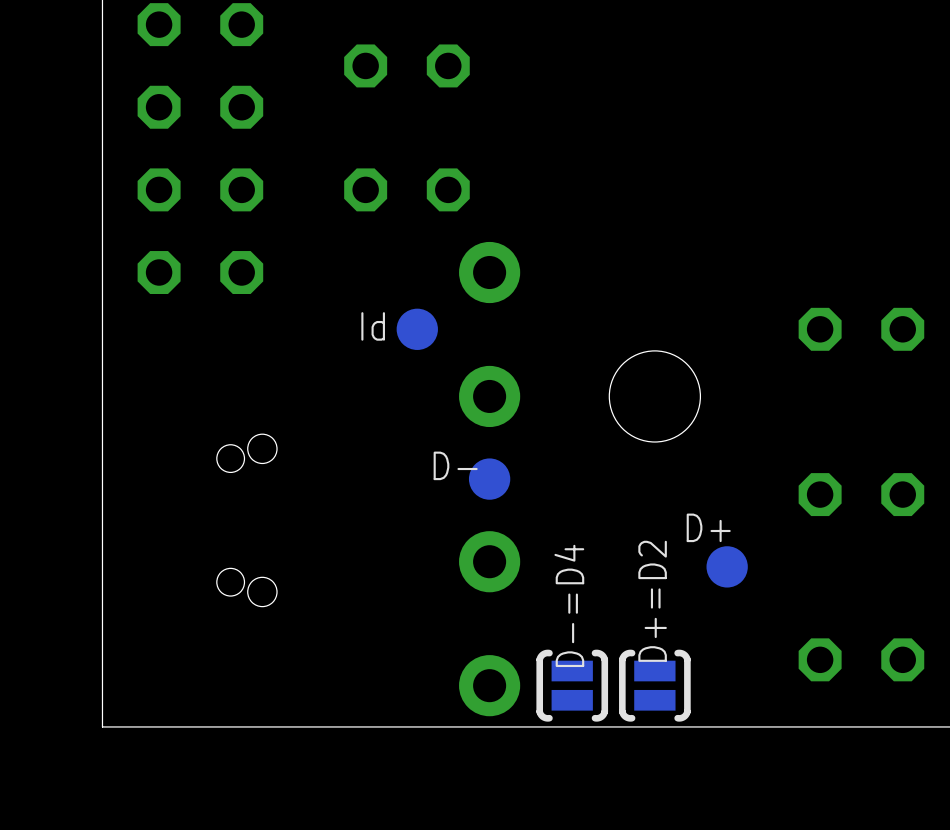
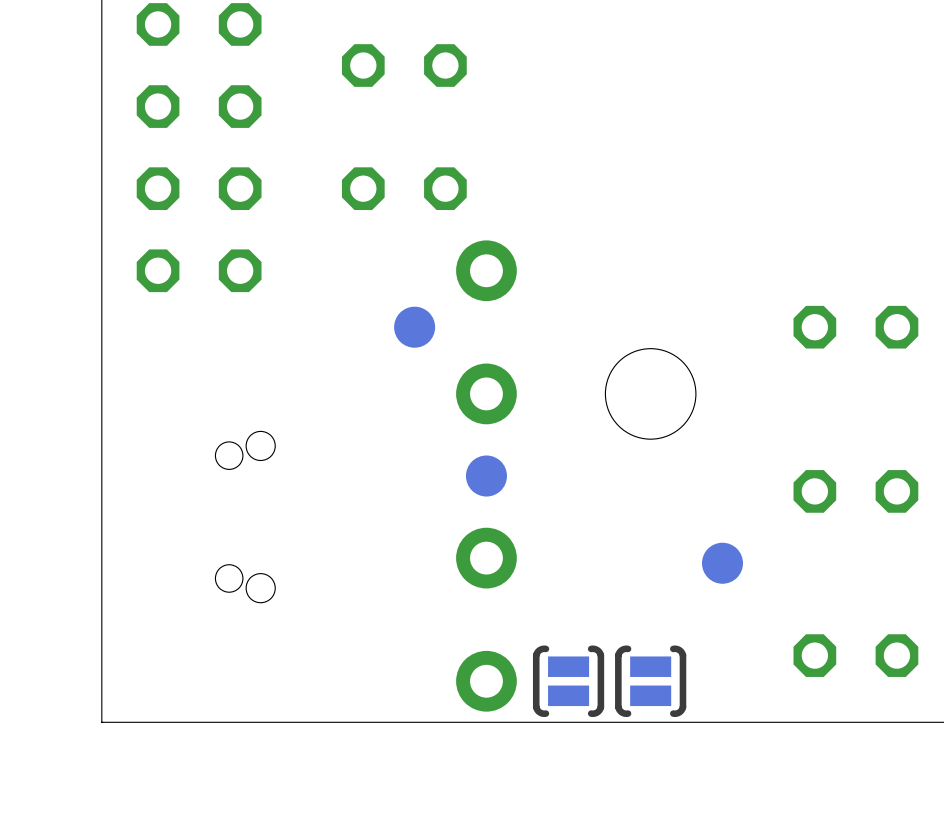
text: Id (373, 326) -> none
text: D- (455, 465) -> none
text: D+ (708, 527) -> none
text: D+=D2 (652, 601) -> none
text: D-=D4 (569, 605) -> none

